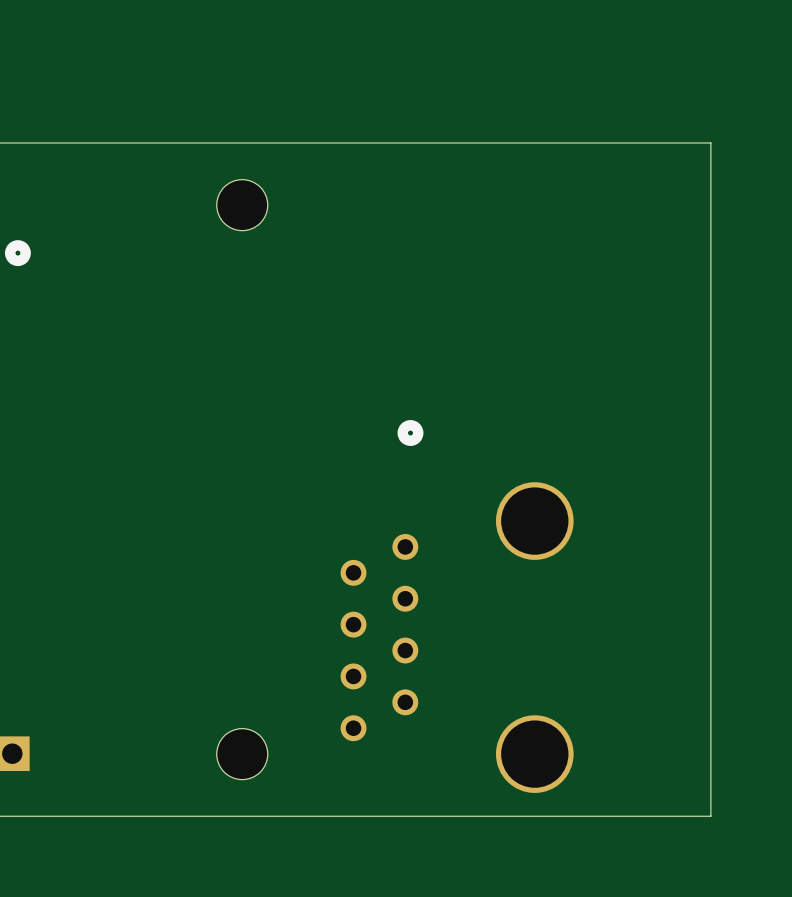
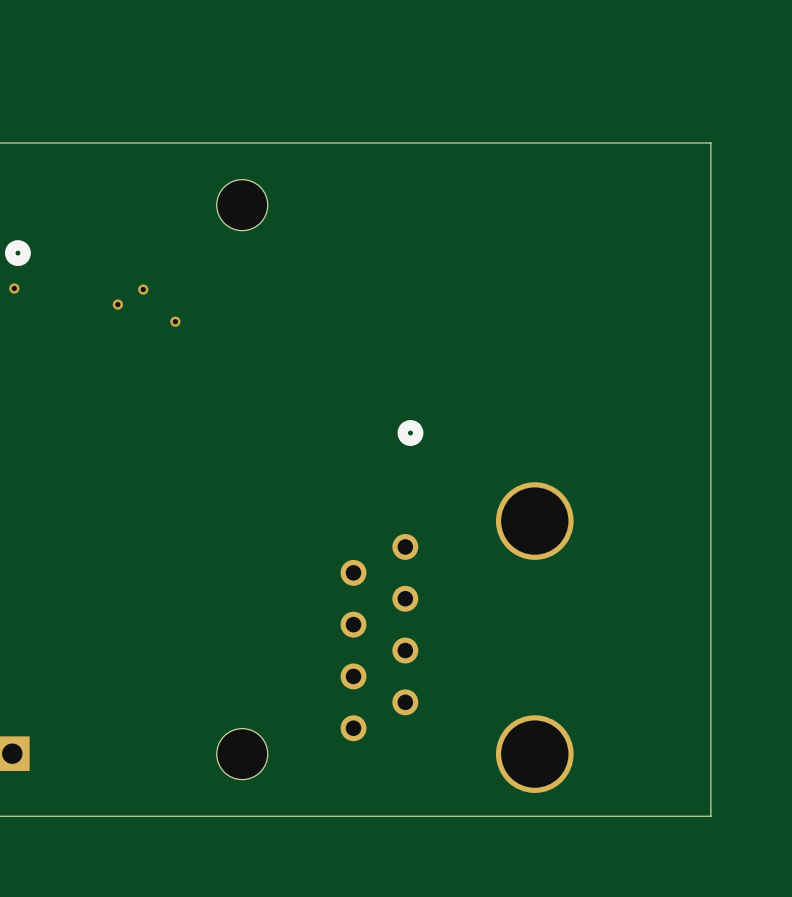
via: none -> (14, 288)
via: none -> (143, 289)
via: none -> (117, 304)
via: none -> (175, 321)

